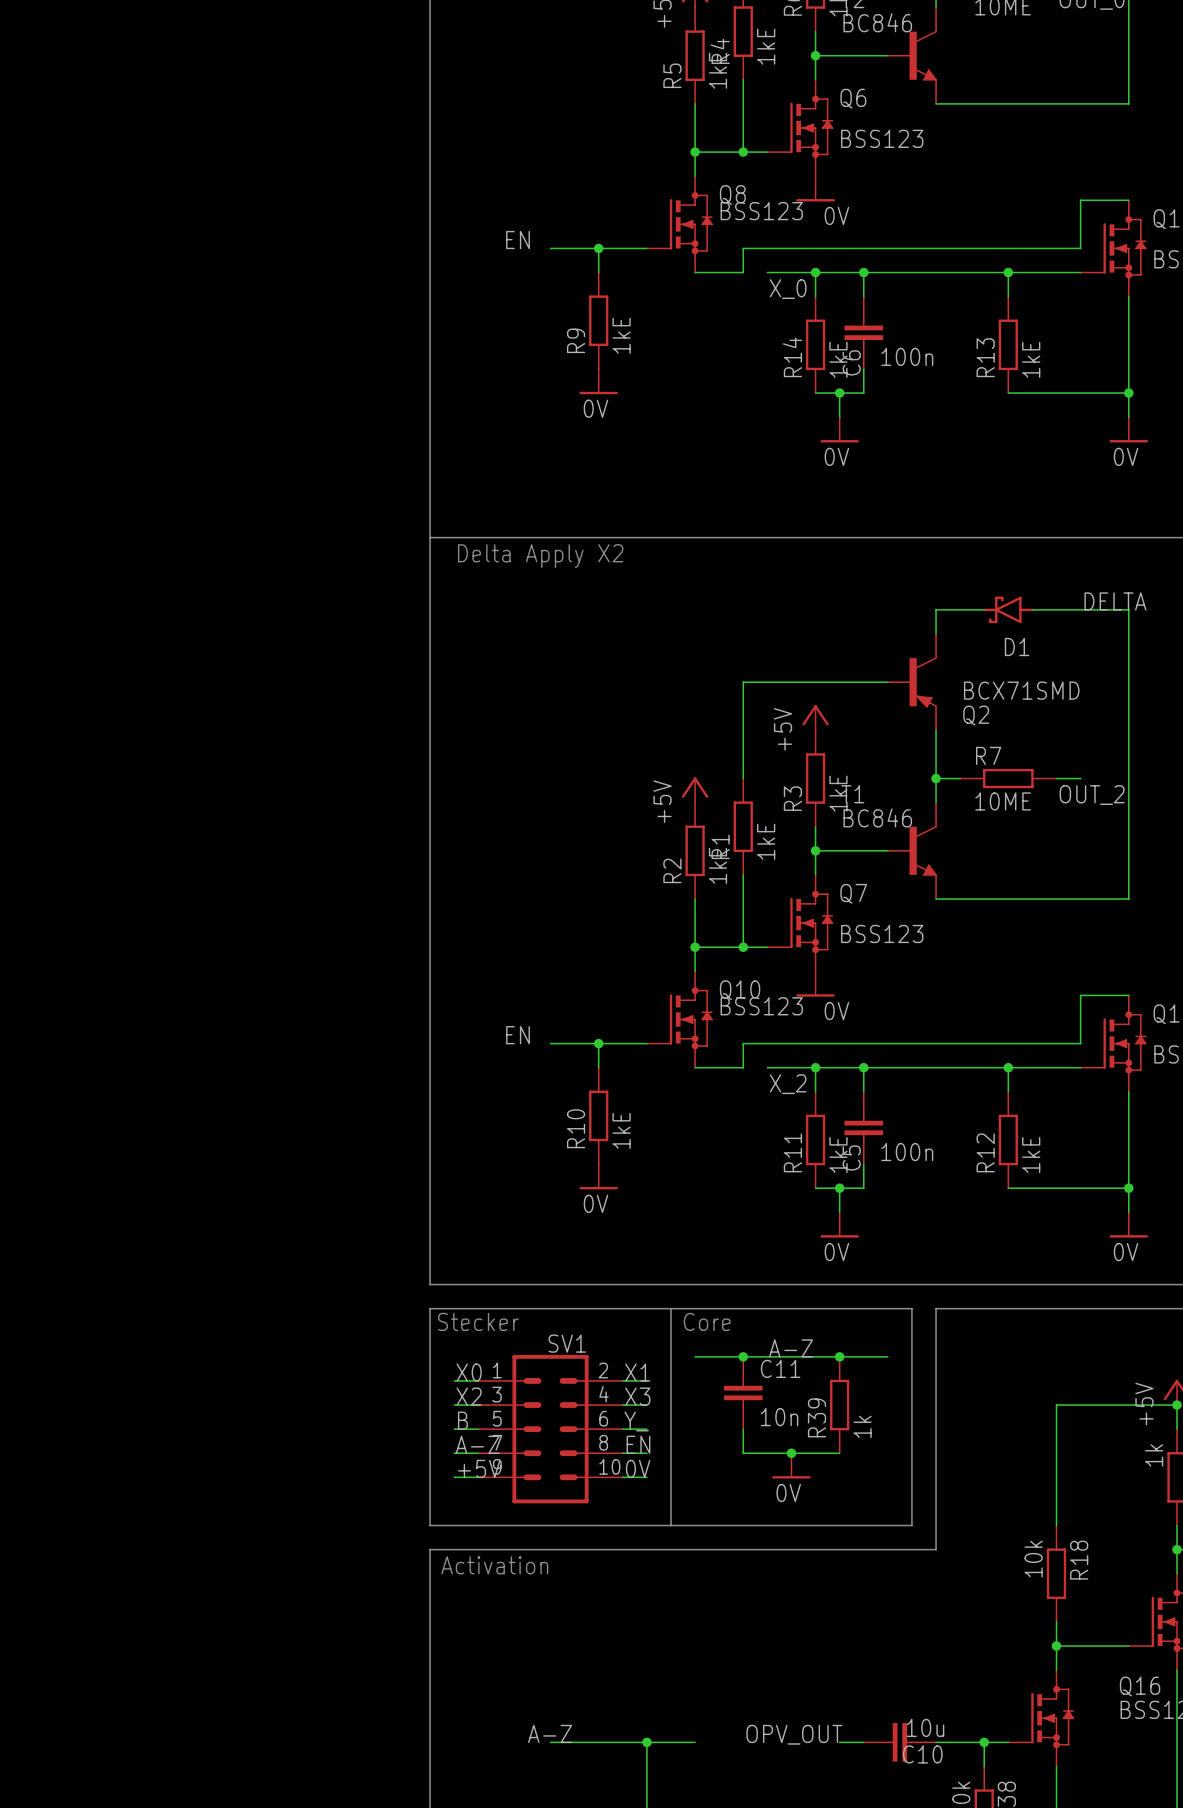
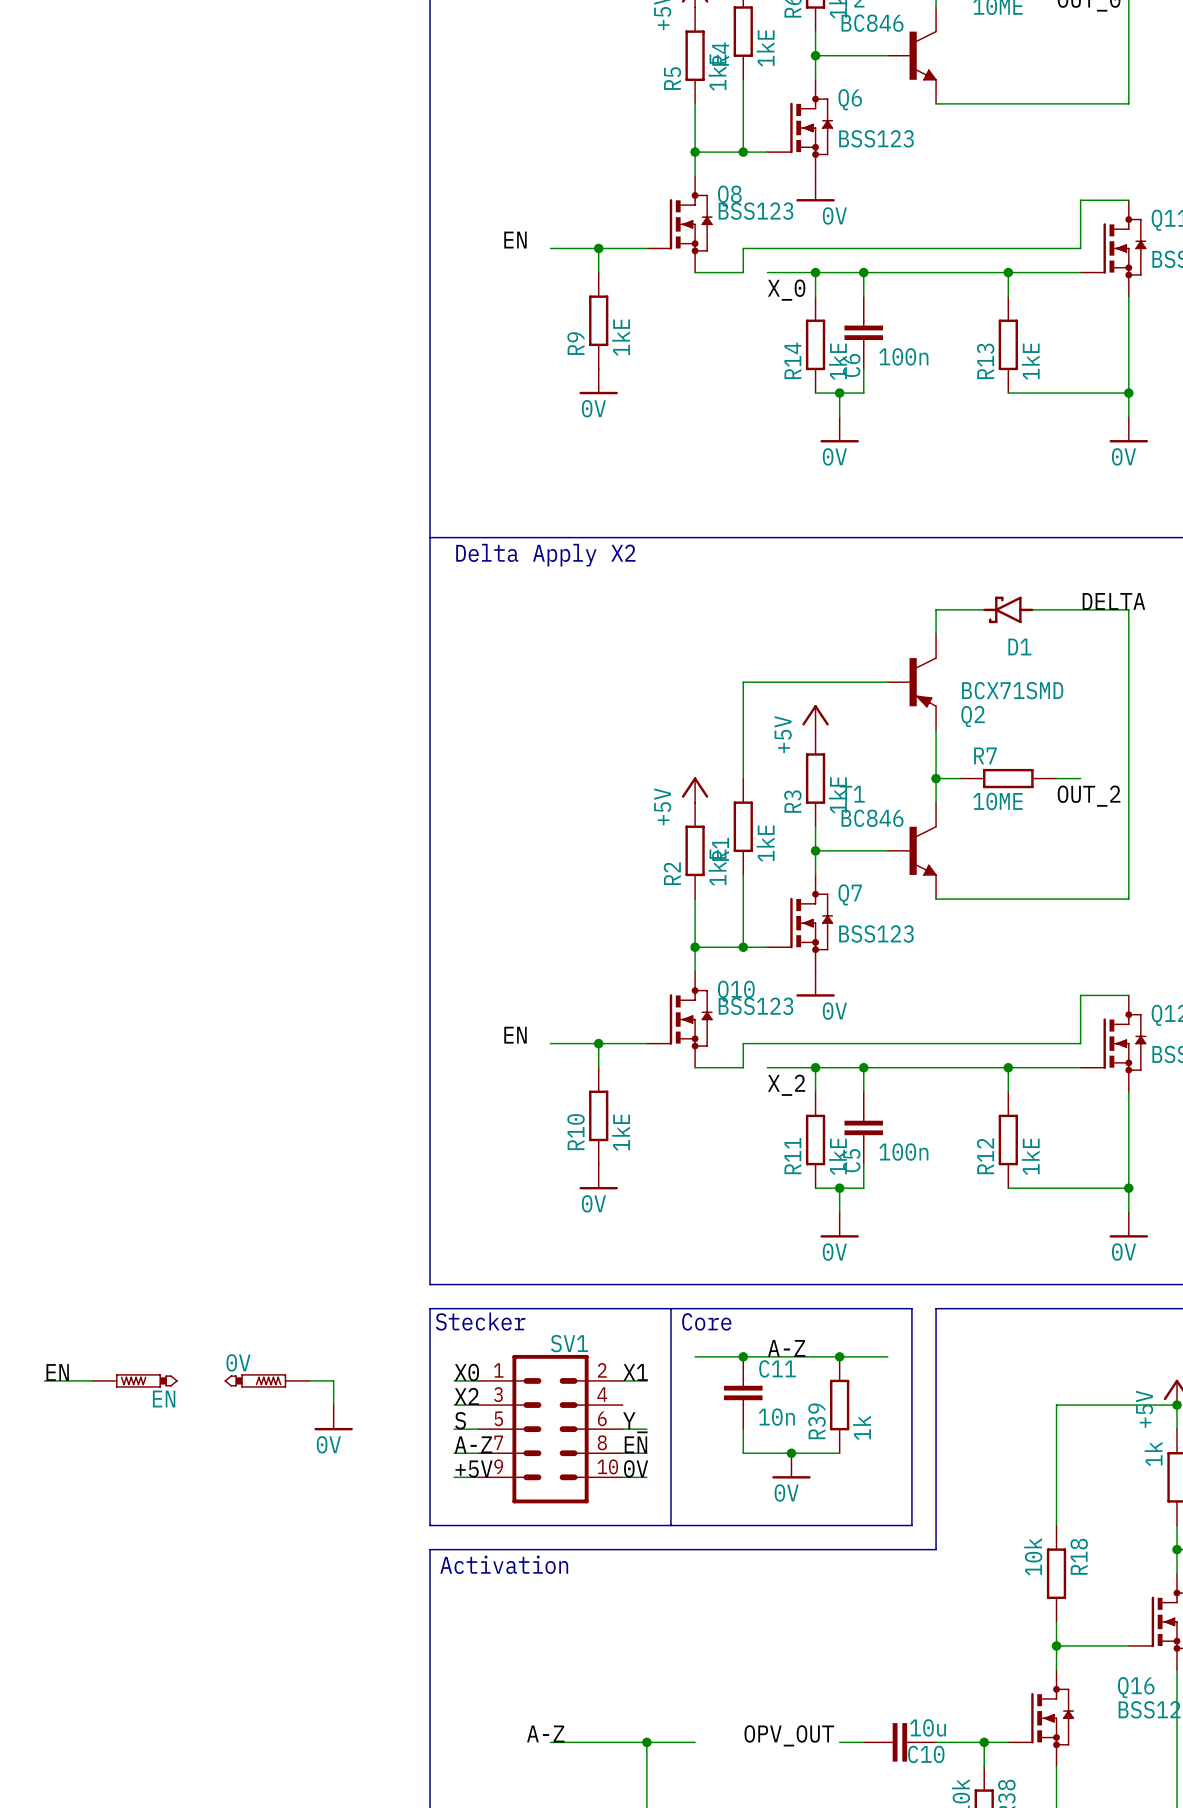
label: none -> EN (57, 1372)
wire: none -> (44, 1380) (92, 1380)
EN: none -> (135, 1380)
0V: none -> (267, 1380)
wire: none -> (309, 1380) (333, 1380) (333, 1405)
label: X3 (637, 1396) -> none
wire: (622, 1405) (646, 1405) -> none
power symbol: none -> 0V (333, 1417)
label: B (462, 1420) -> S (460, 1420)

